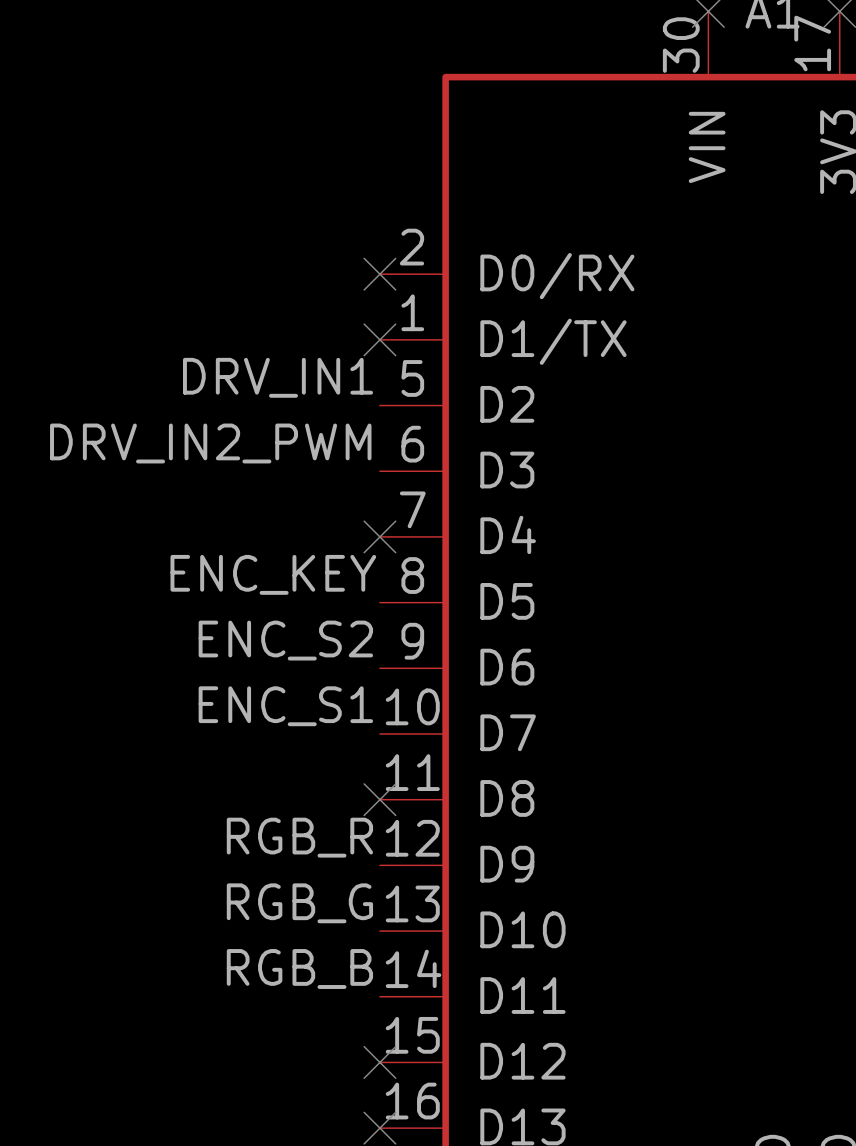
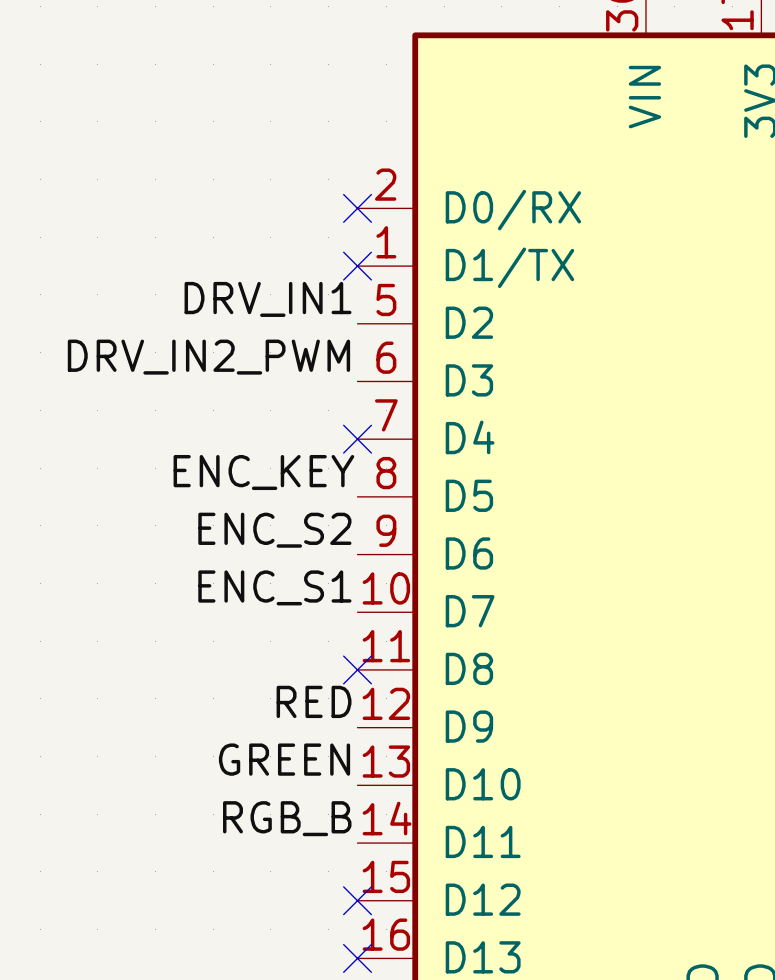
label: RGB_R (299, 837) -> RED (314, 701)
label: RGB_G (299, 903) -> GREEN (284, 759)

